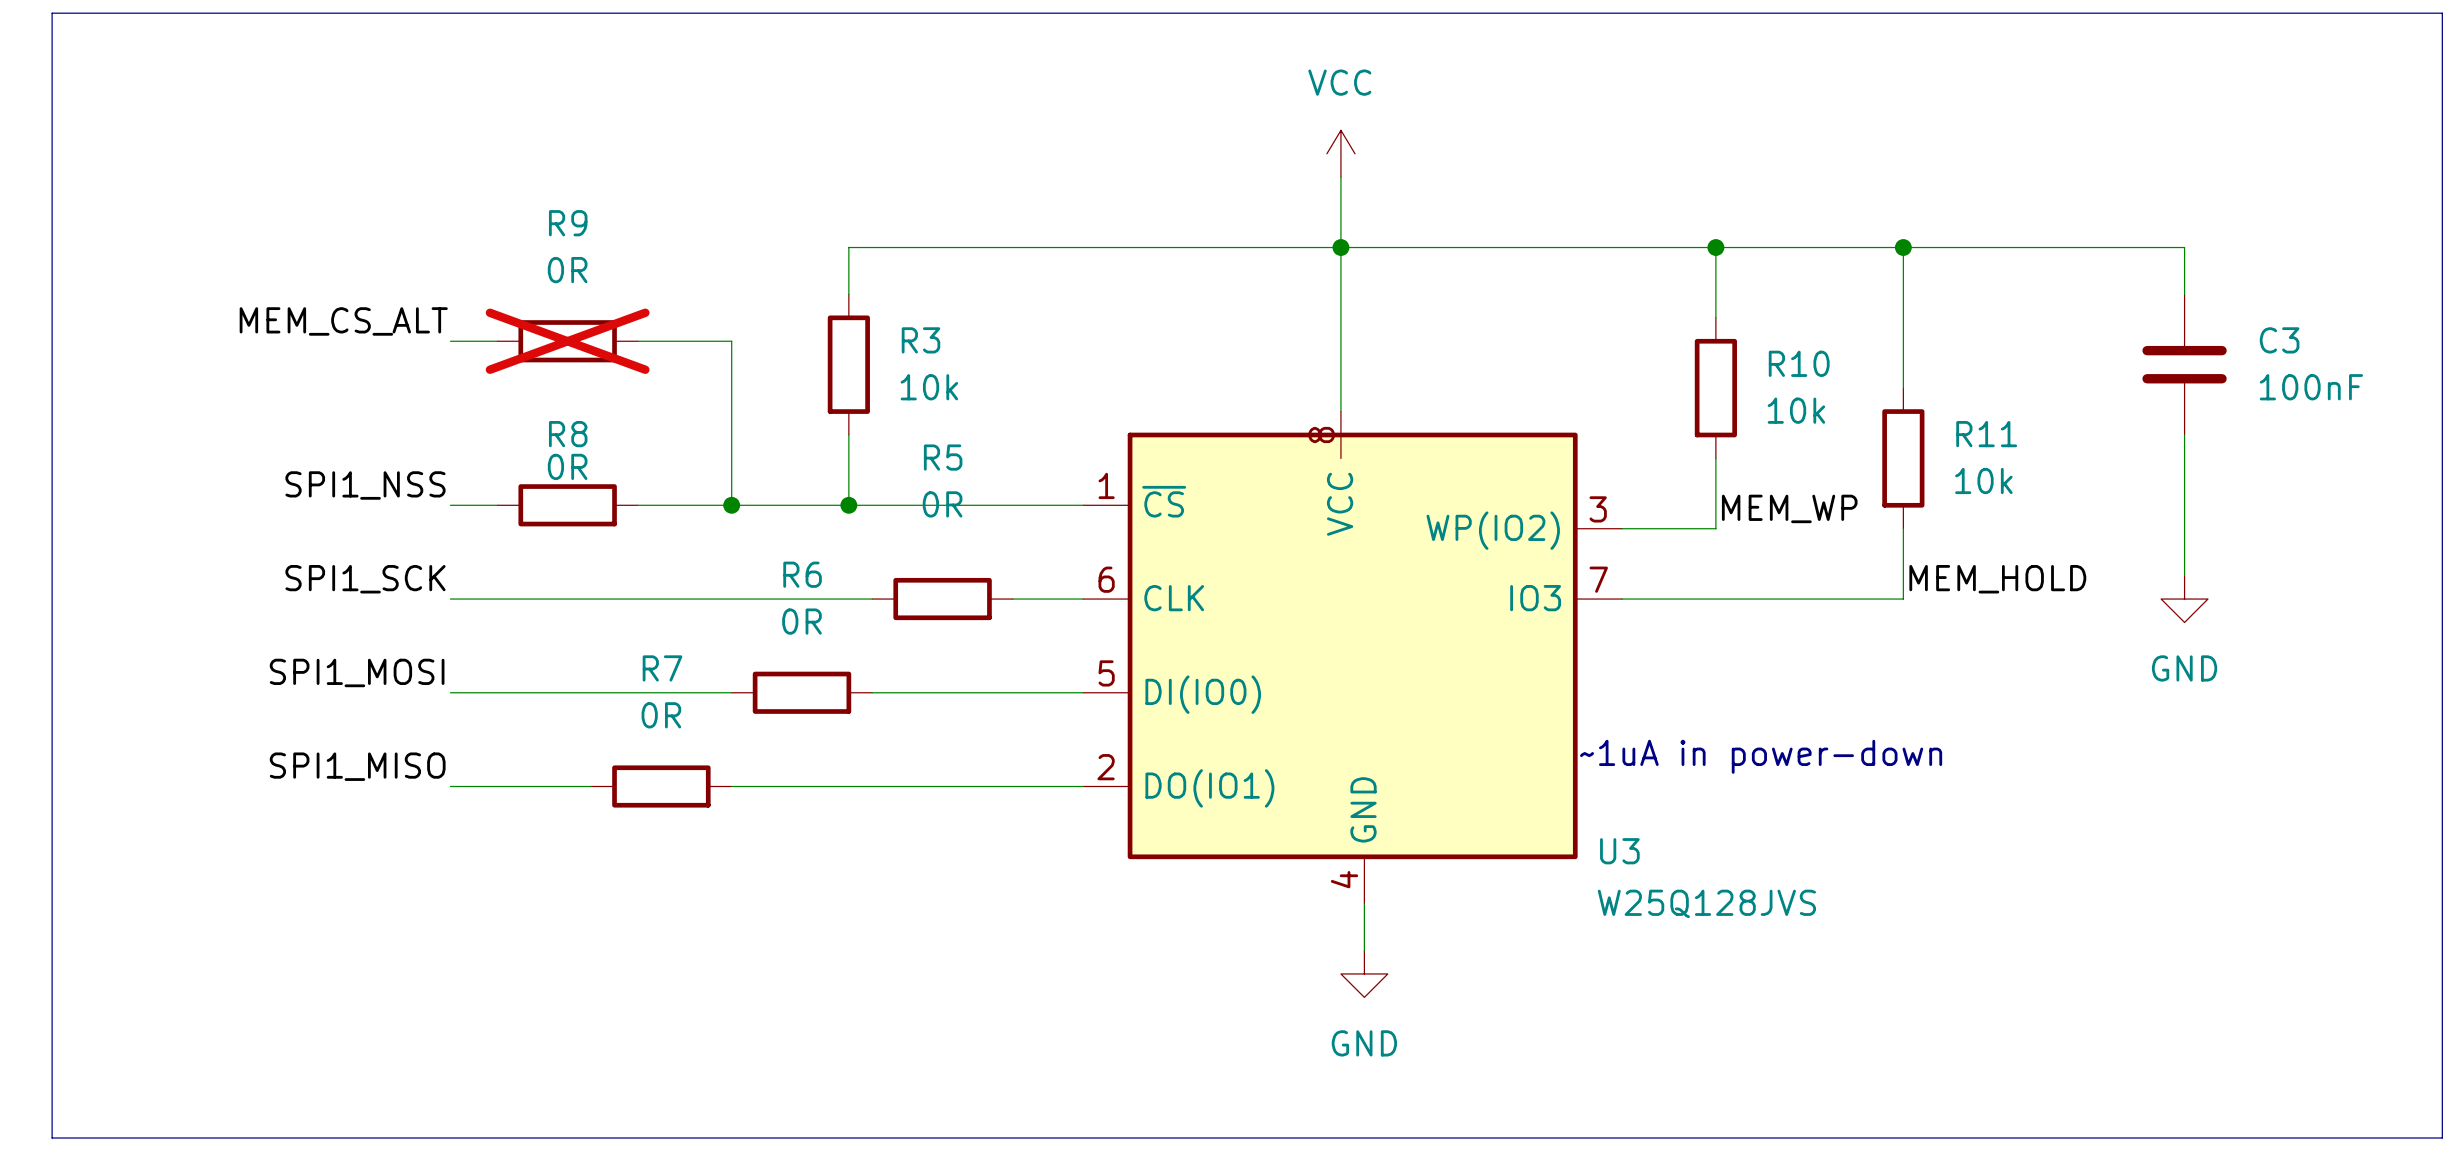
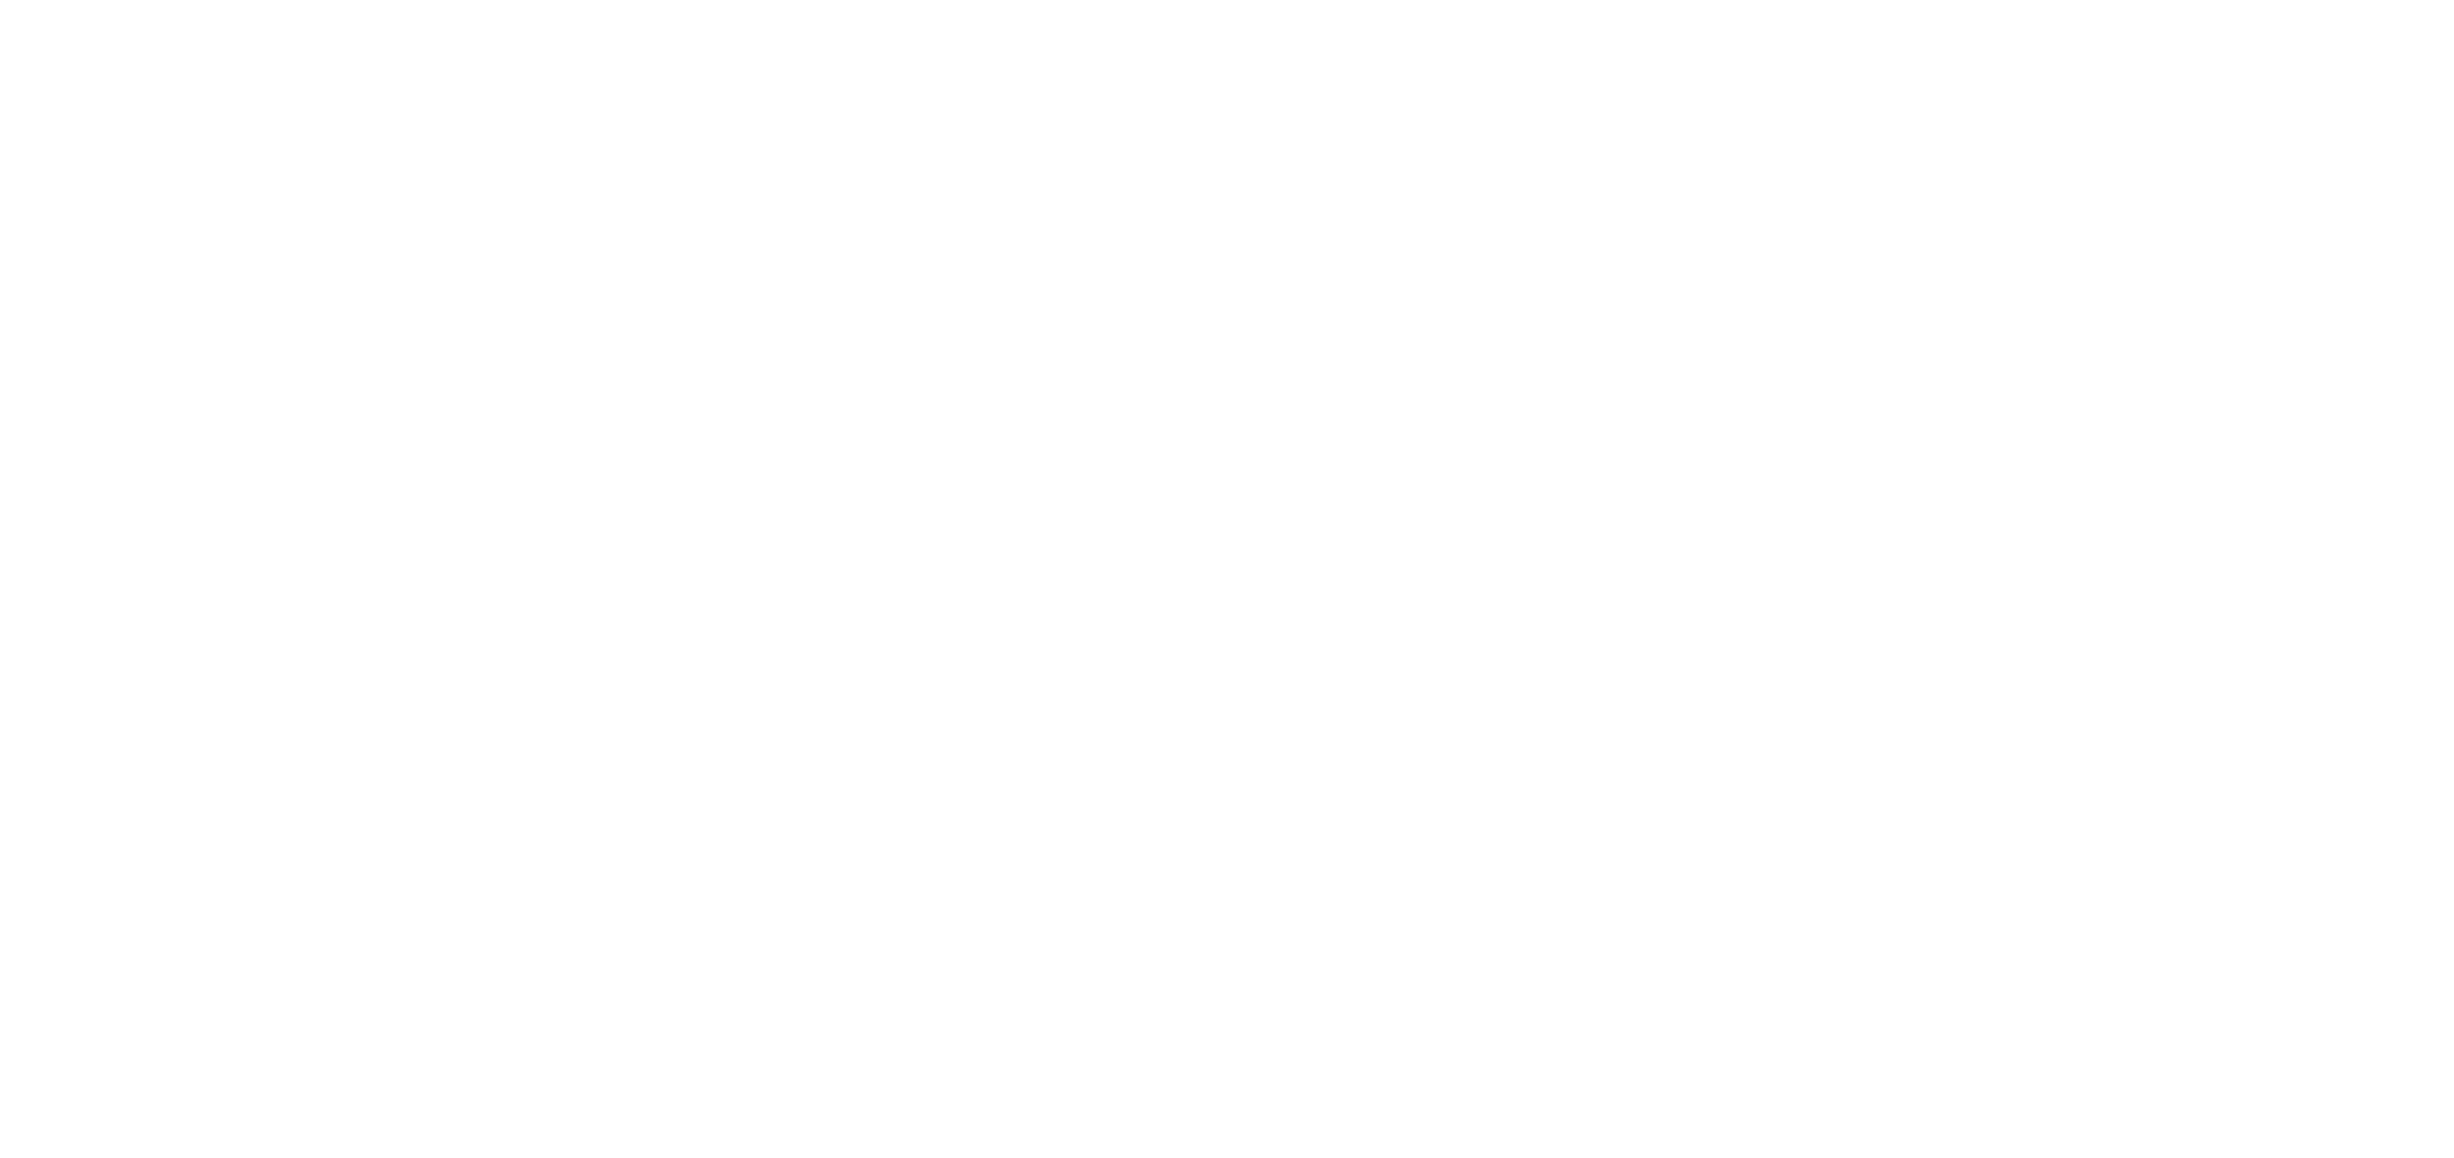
line: (52, 13) (2442, 13) (2442, 1138) (52, 1138) (52, 13) -> none
power symbol: VCC (1340, 153) -> none
wire: (1340, 177) (1340, 411) -> none
junction: (1340, 247) -> none
wire: (1715, 247) (1715, 317) -> none
junction: (1715, 247) -> none
wire: (1903, 247) (1903, 388) -> none
junction: (1903, 247) -> none
wire: (848, 294) (848, 247) (2184, 247) (2184, 294) -> none
label: MEM_CS_ALT (343, 321) -> none
wire: (450, 341) (497, 341) -> none
R9: 0R (567, 341) -> none
wire: (637, 341) (731, 341) (731, 505) -> none
R3: 10k (848, 364) -> none
C3: 100nF (2184, 364) -> none
R10: 10k (1715, 388) -> none
wire: (848, 434) (848, 505) -> none
wire: (2184, 434) (2184, 575) -> none
wire: (1715, 458) (1715, 528) (1622, 528) -> none
R11: 10k (1903, 458) -> none
label: SPI1_NSS (365, 485) -> none
wire: (450, 505) (497, 505) -> none
R8: 0R (567, 505) -> none
wire: (637, 505) (1083, 505) -> none
junction: (731, 505) -> none
junction: (848, 505) -> none
label: MEM_WP (1789, 508) -> none
wire: (1903, 528) (1903, 599) (1622, 599) -> none
label: SPI1_SCK (365, 579) -> none
label: MEM_HOLD (1997, 579) -> none
wire: (450, 599) (872, 599) -> none
R5: 0R (942, 599) -> none
wire: (1012, 599) (1083, 599) -> none
power symbol: GND (2184, 599) -> none
U3: W25Q128JVS (1352, 657) -> none
label: SPI1_MOSI (357, 672) -> none
wire: (450, 692) (731, 692) -> none
R6: 0R (801, 692) -> none
wire: (872, 692) (1083, 692) -> none
text: ~1uA in power-down (1761, 756) -> none
label: SPI1_MISO (357, 766) -> none
wire: (450, 786) (591, 786) -> none
R7: 0R (661, 786) -> none
wire: (731, 786) (1083, 786) -> none
wire: (1364, 903) (1364, 950) -> none
power symbol: GND (1364, 973) -> none

